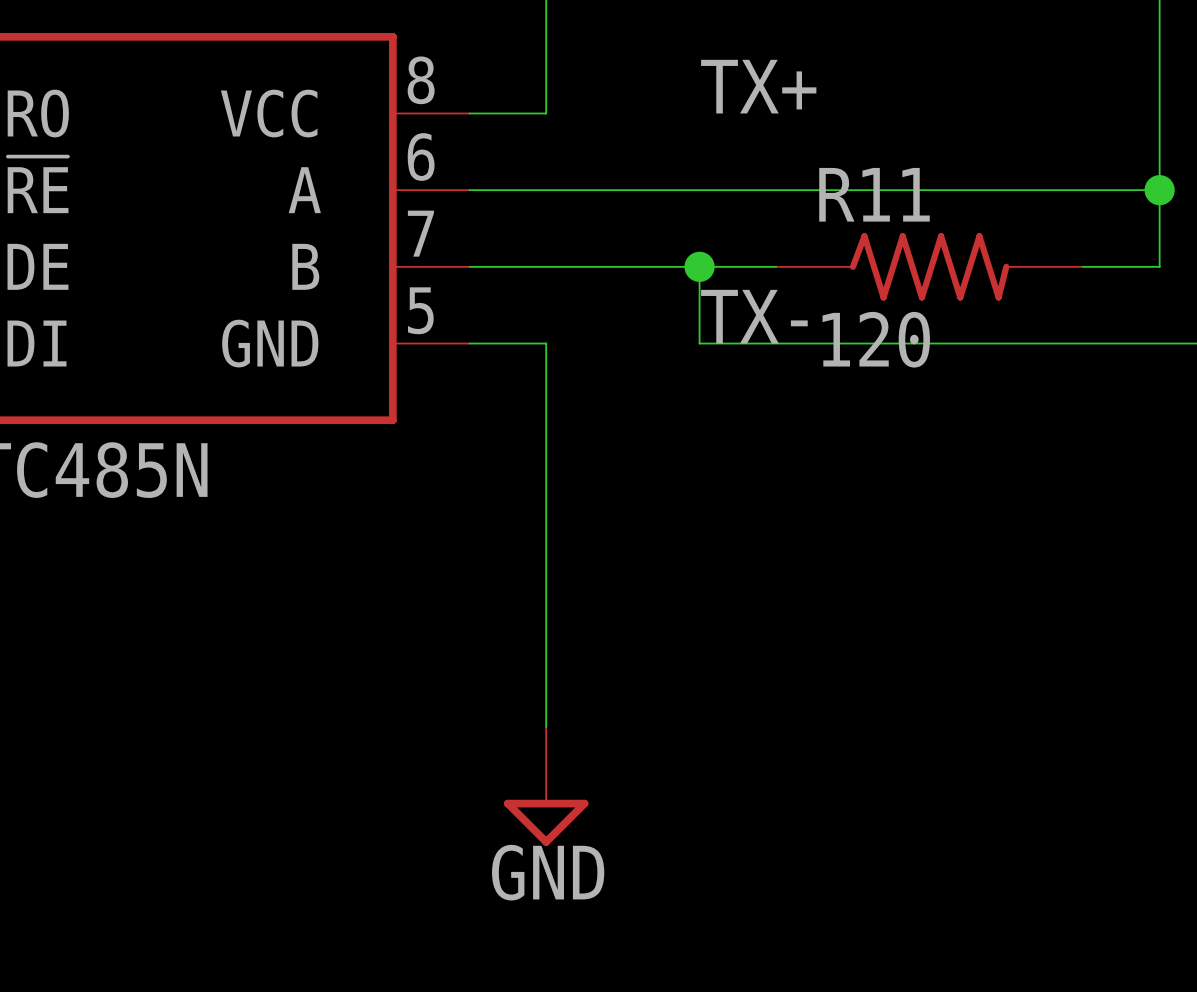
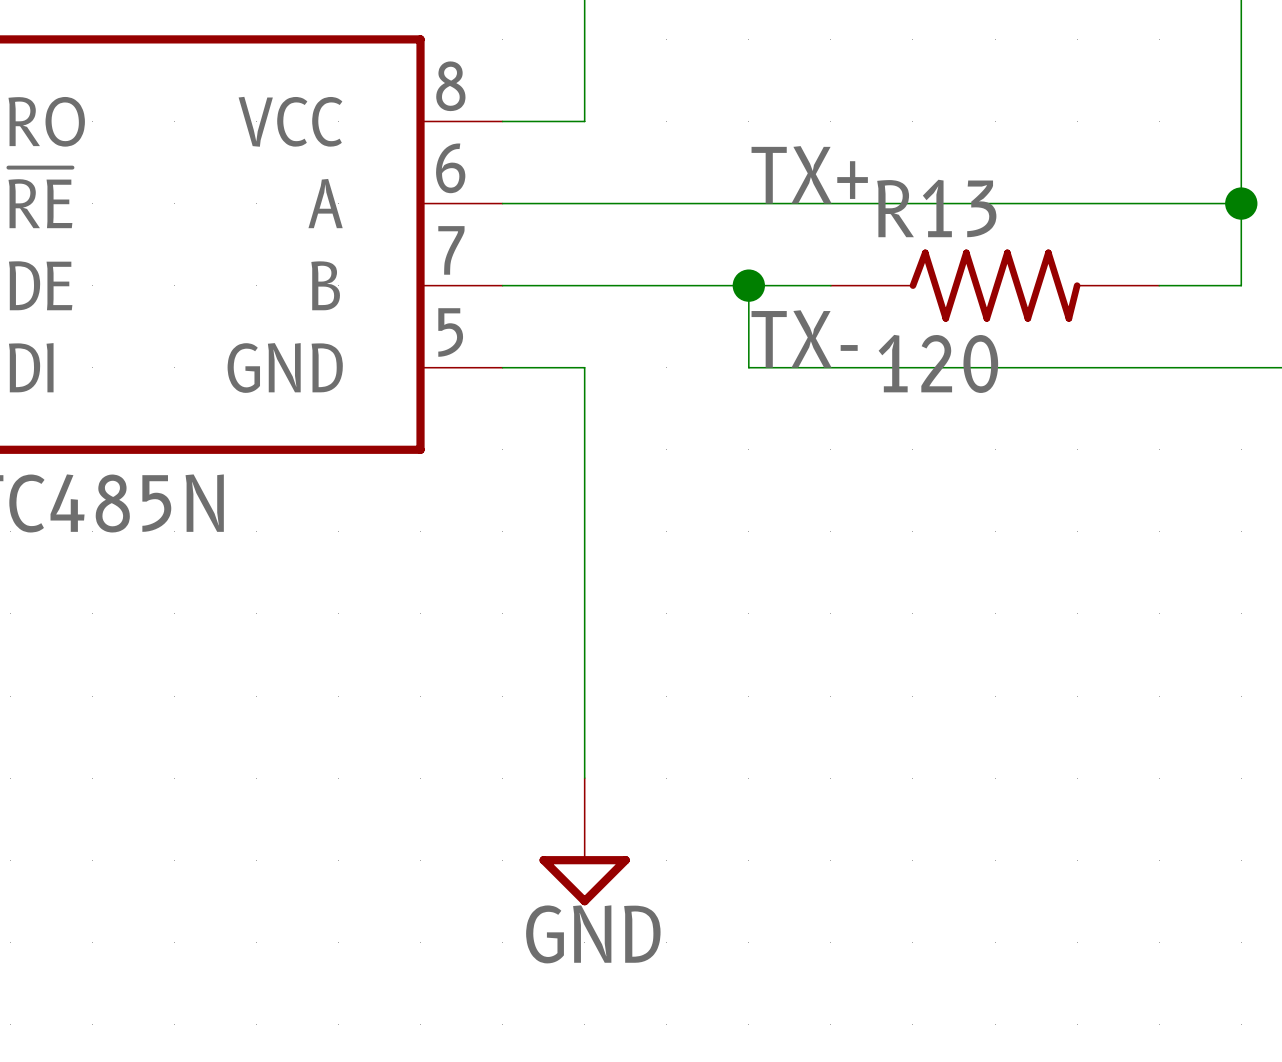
label position: TX+ (758, 86) -> TX+ (809, 174)
R11 name: R11 (874, 194) -> R13 (936, 208)

